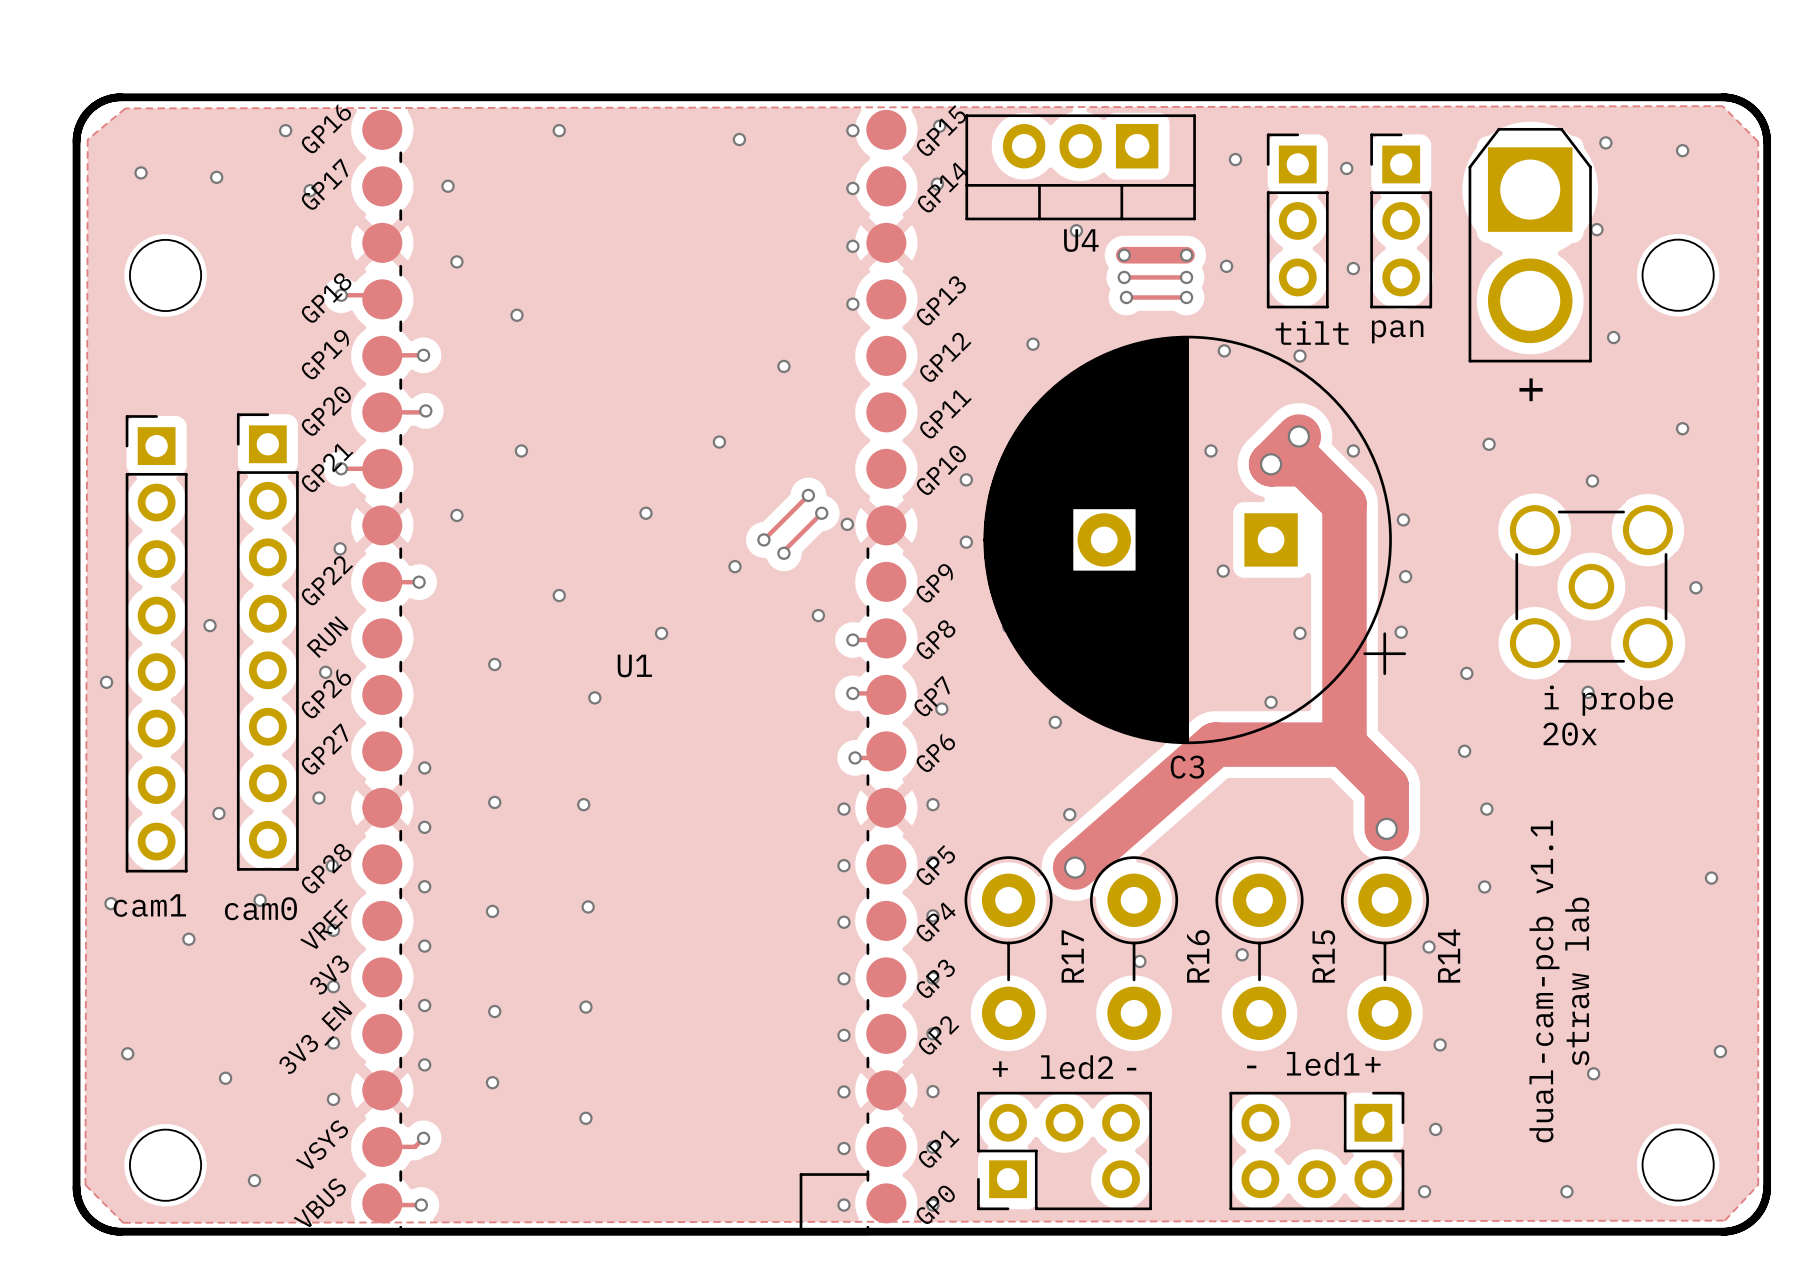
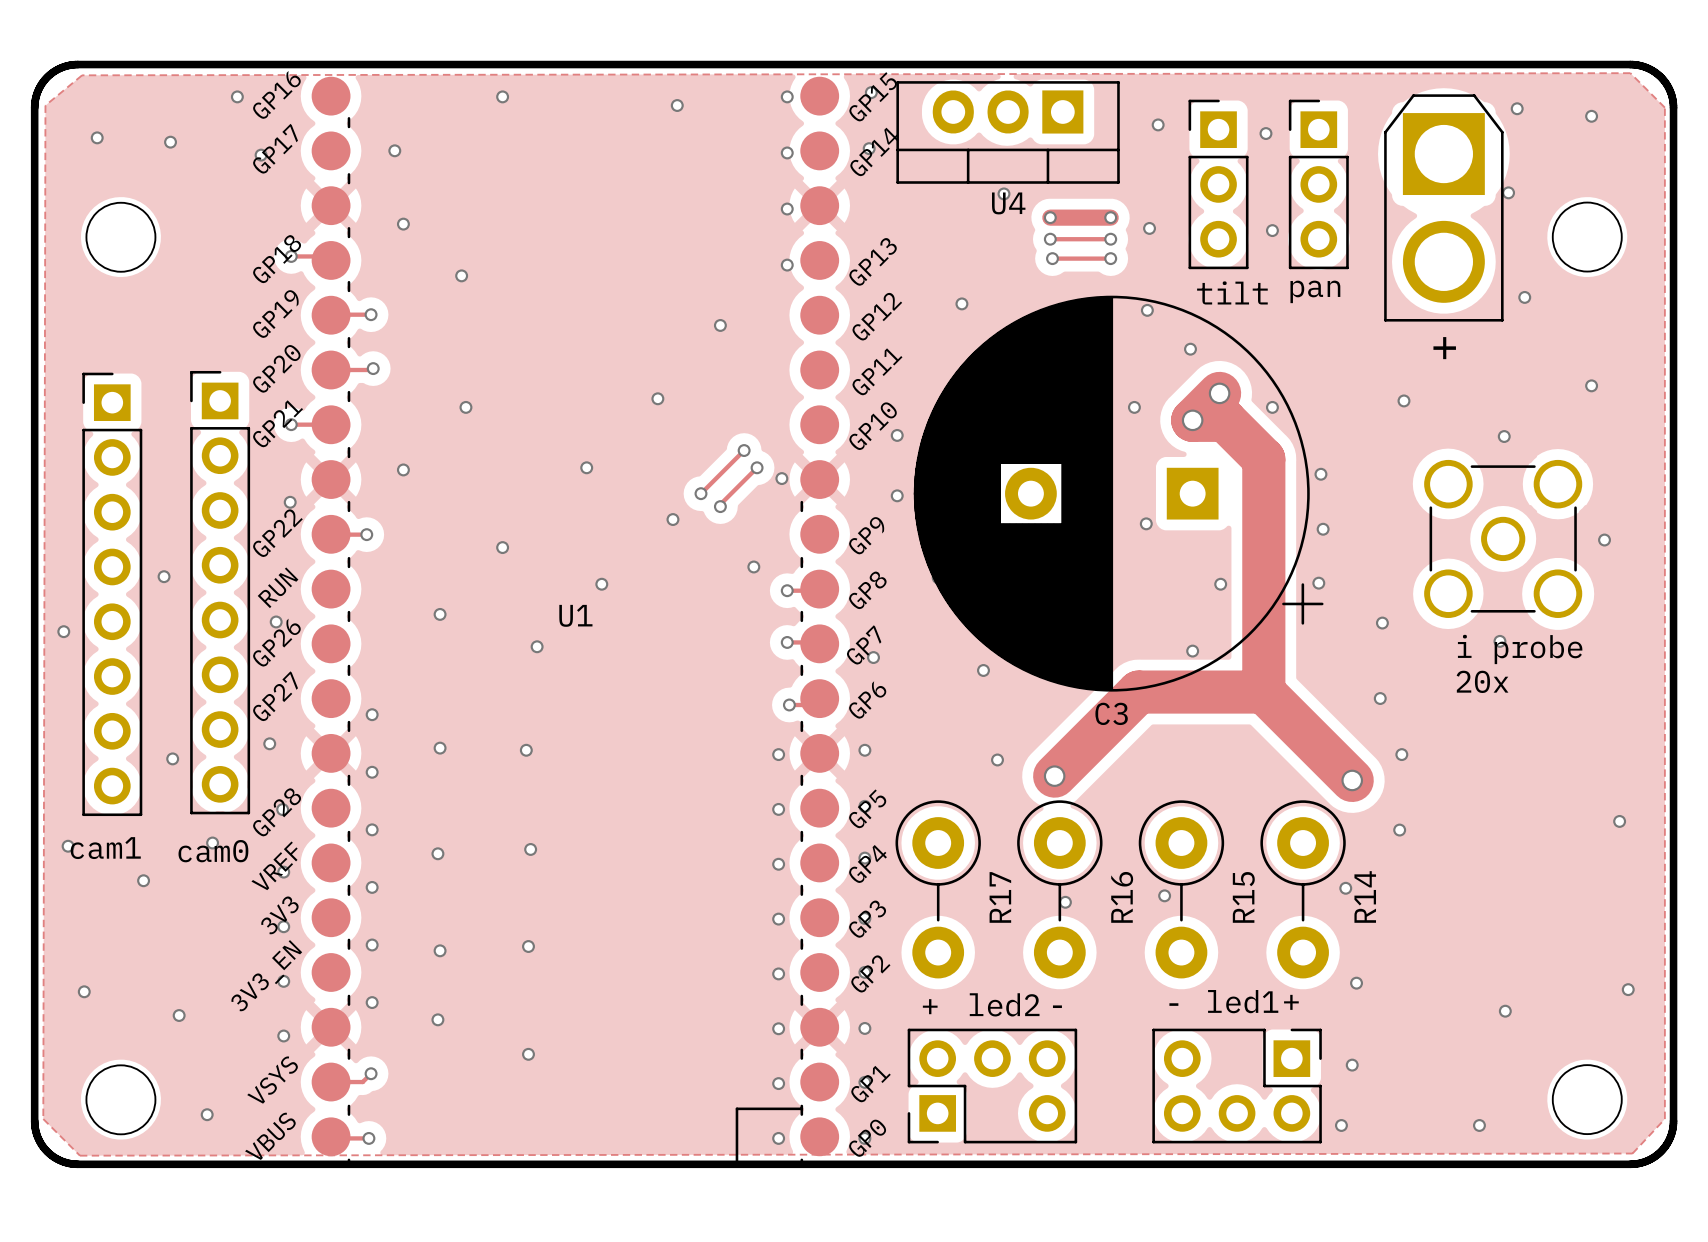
via position: (1299, 355) -> (1190, 349)
track: (1215, 744) (1075, 867) -> (1138, 692) (1054, 776)
track: (1386, 786) (1386, 828) -> (1304, 733) (1352, 780)
via position: (1386, 828) -> (1352, 780)
via position: (1075, 867) -> (1054, 776)
text: dual-cam-pcb v1.1 (1544, 981) -> none
text: straw lab (1577, 981) -> none

